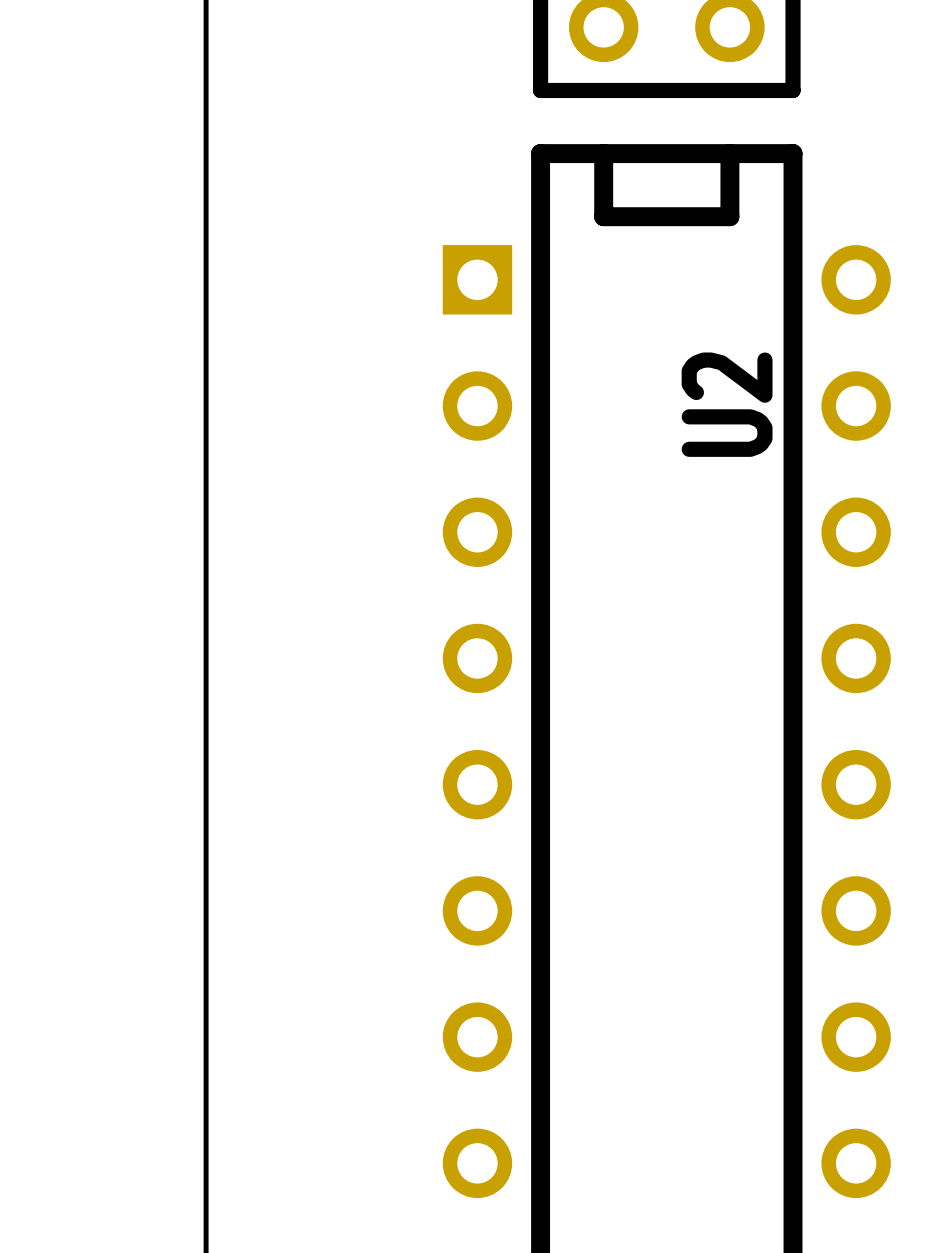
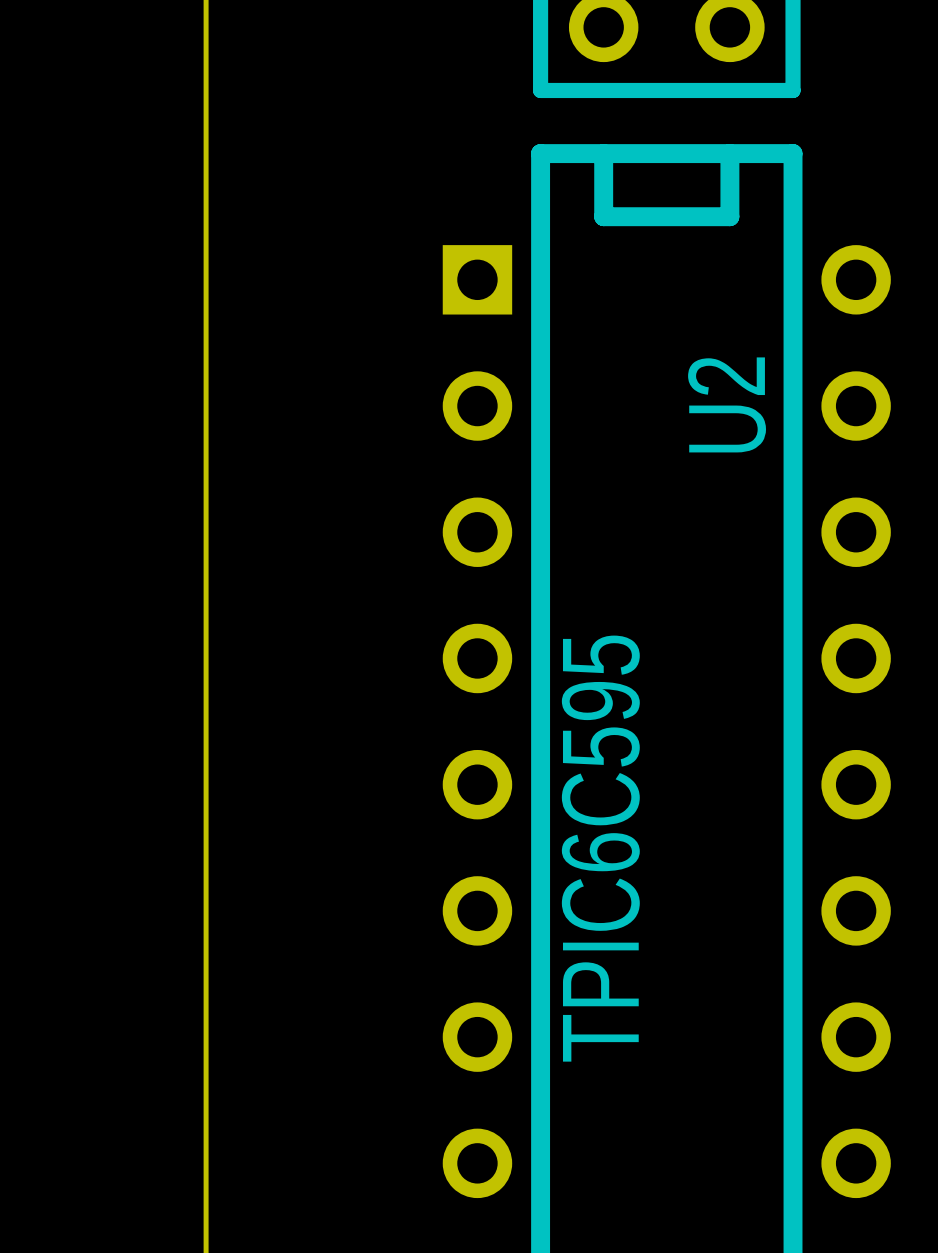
U2 value: none -> TPIC6C595 (600, 848)

